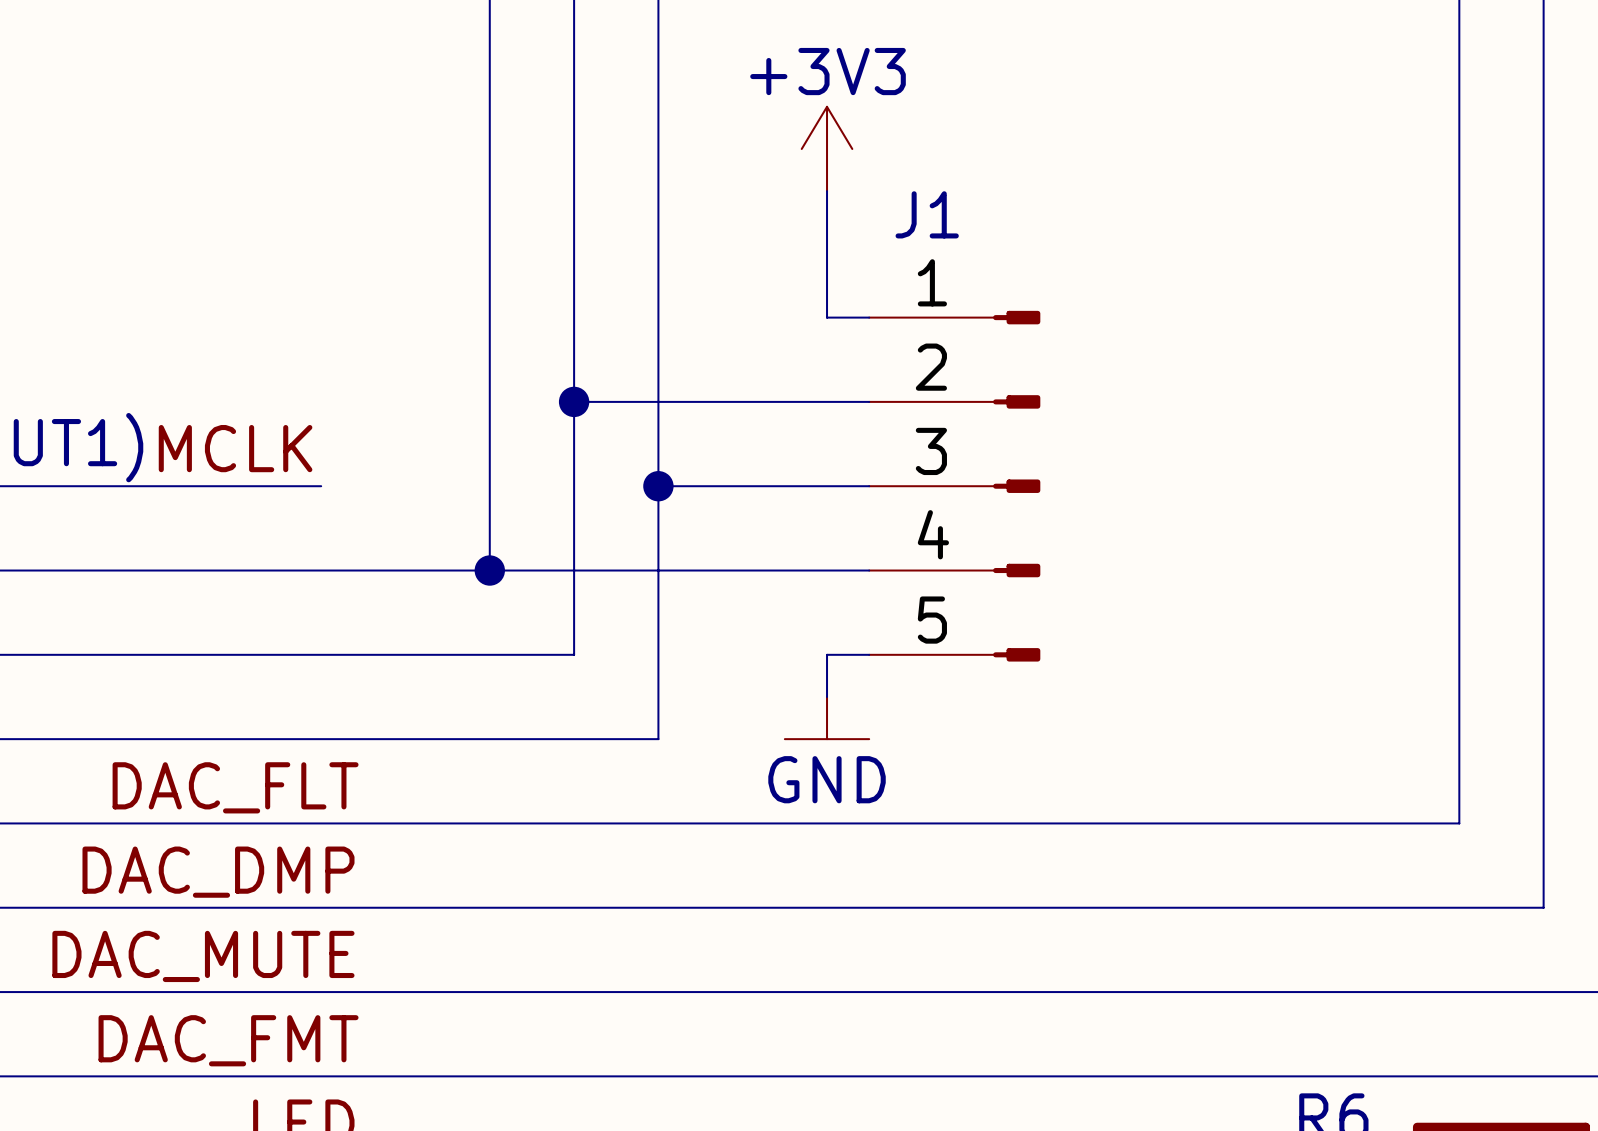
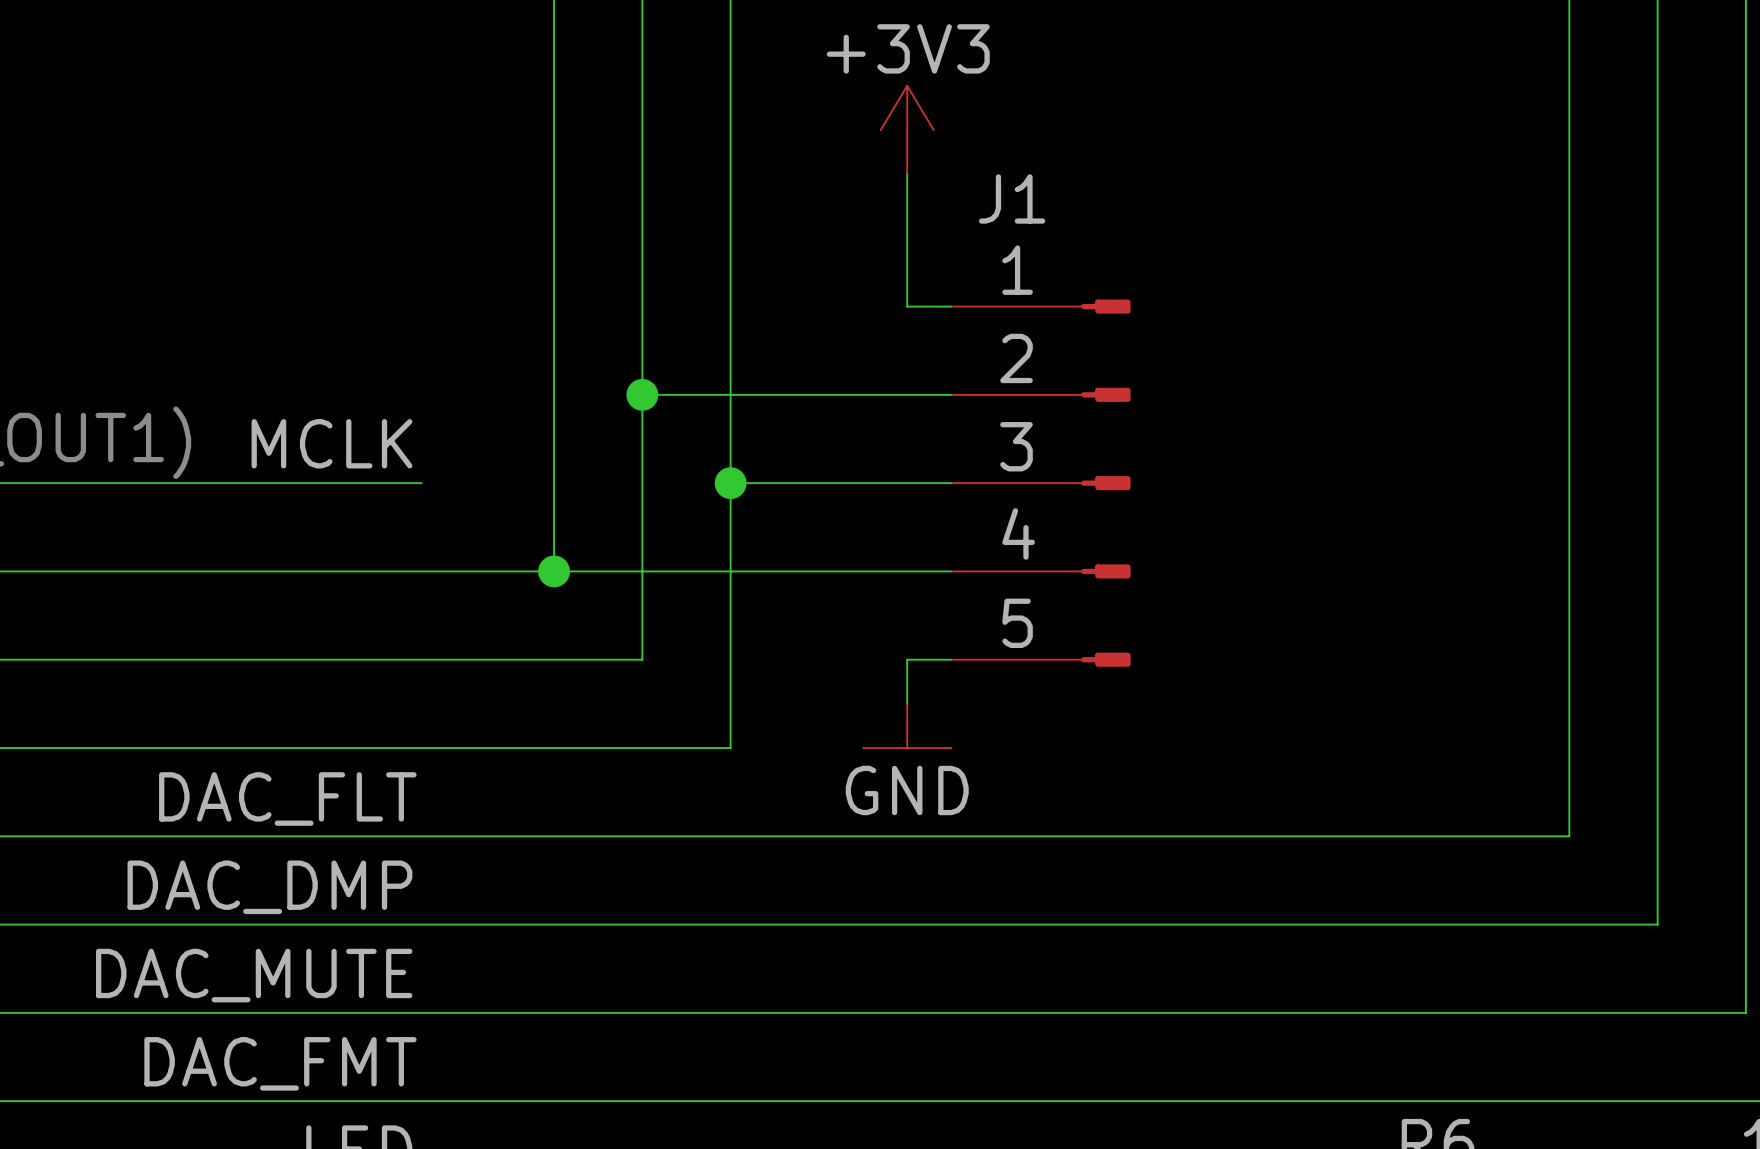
label position: MCLK (235, 448) -> MCLK (331, 443)
wire: none -> (377, 483) (421, 483)

